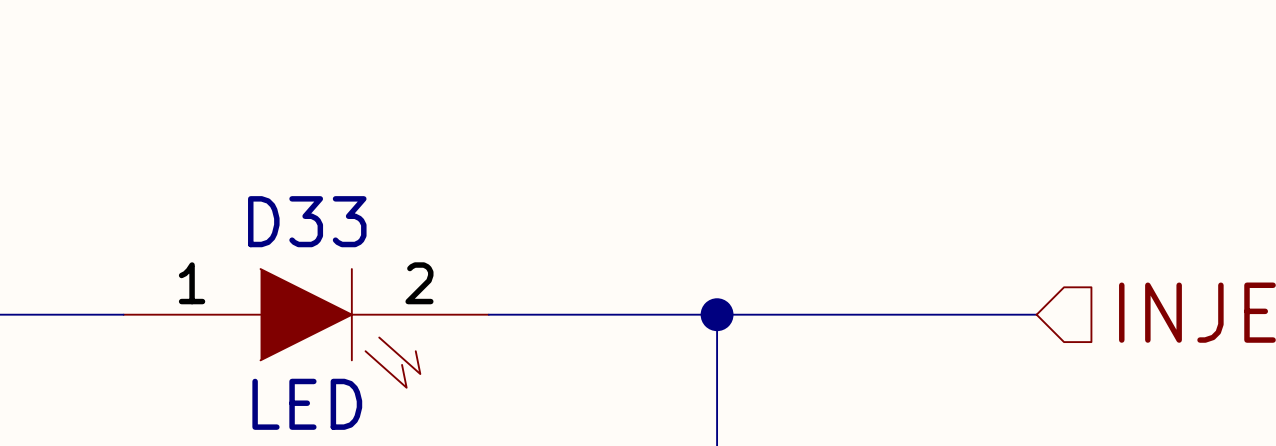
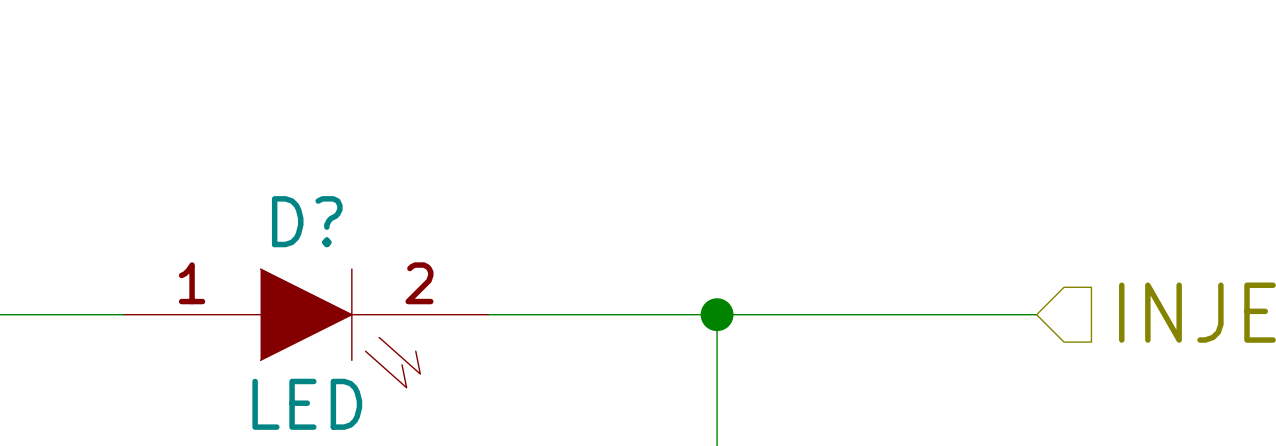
D33 name: D33 (307, 221) -> D? (307, 221)

